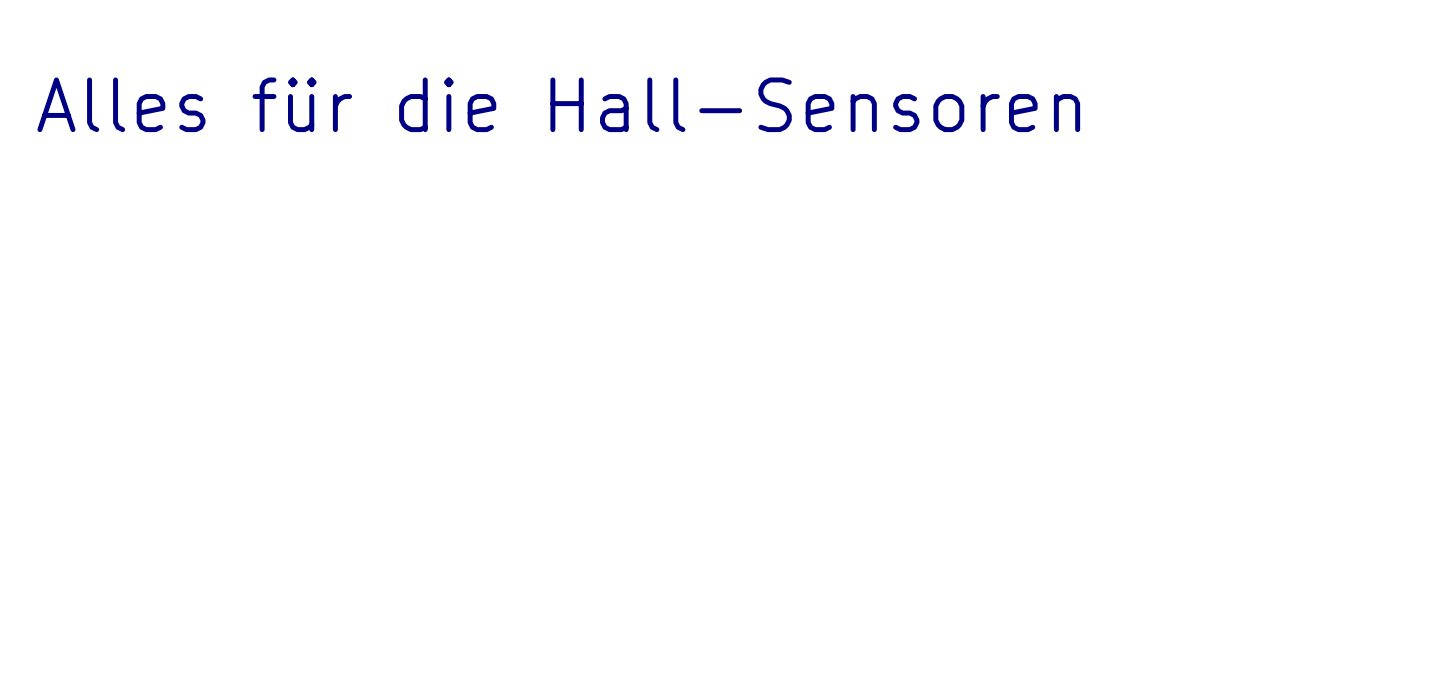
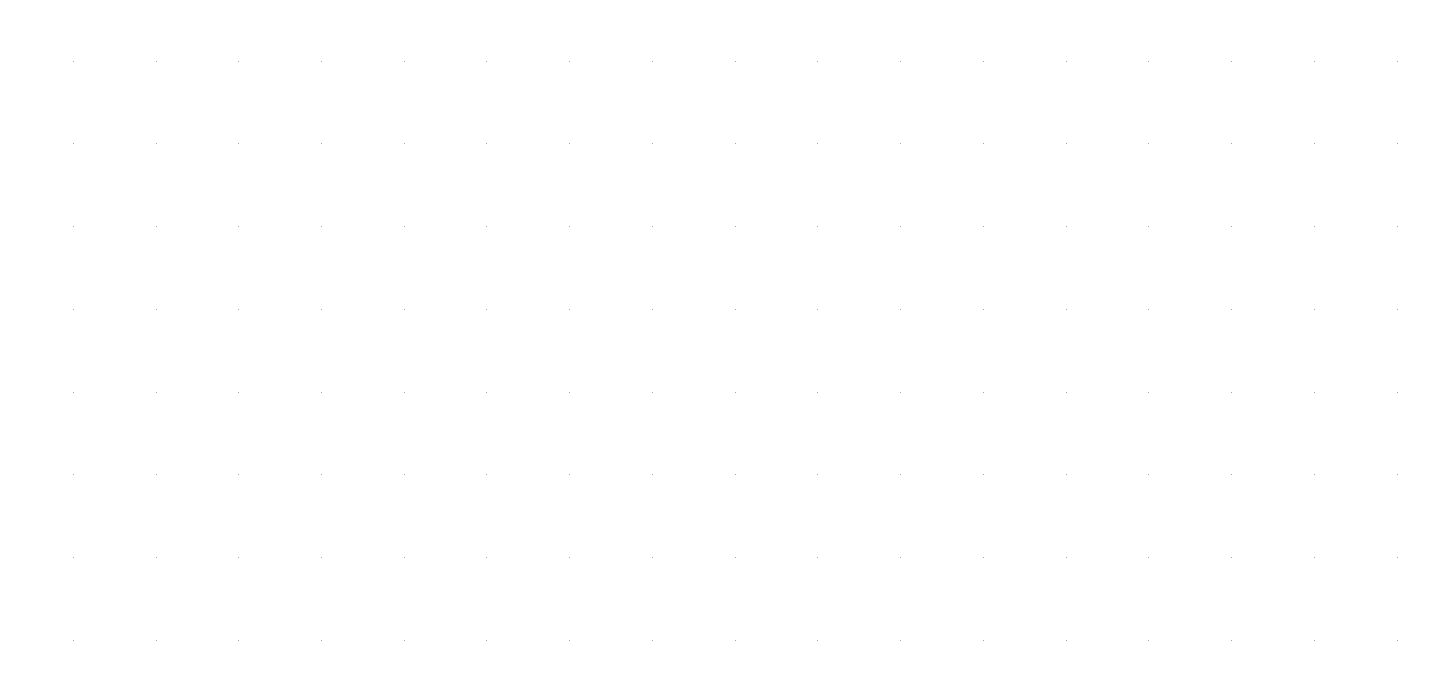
text: Alles für die Hall-Sensoren (558, 104) -> none

